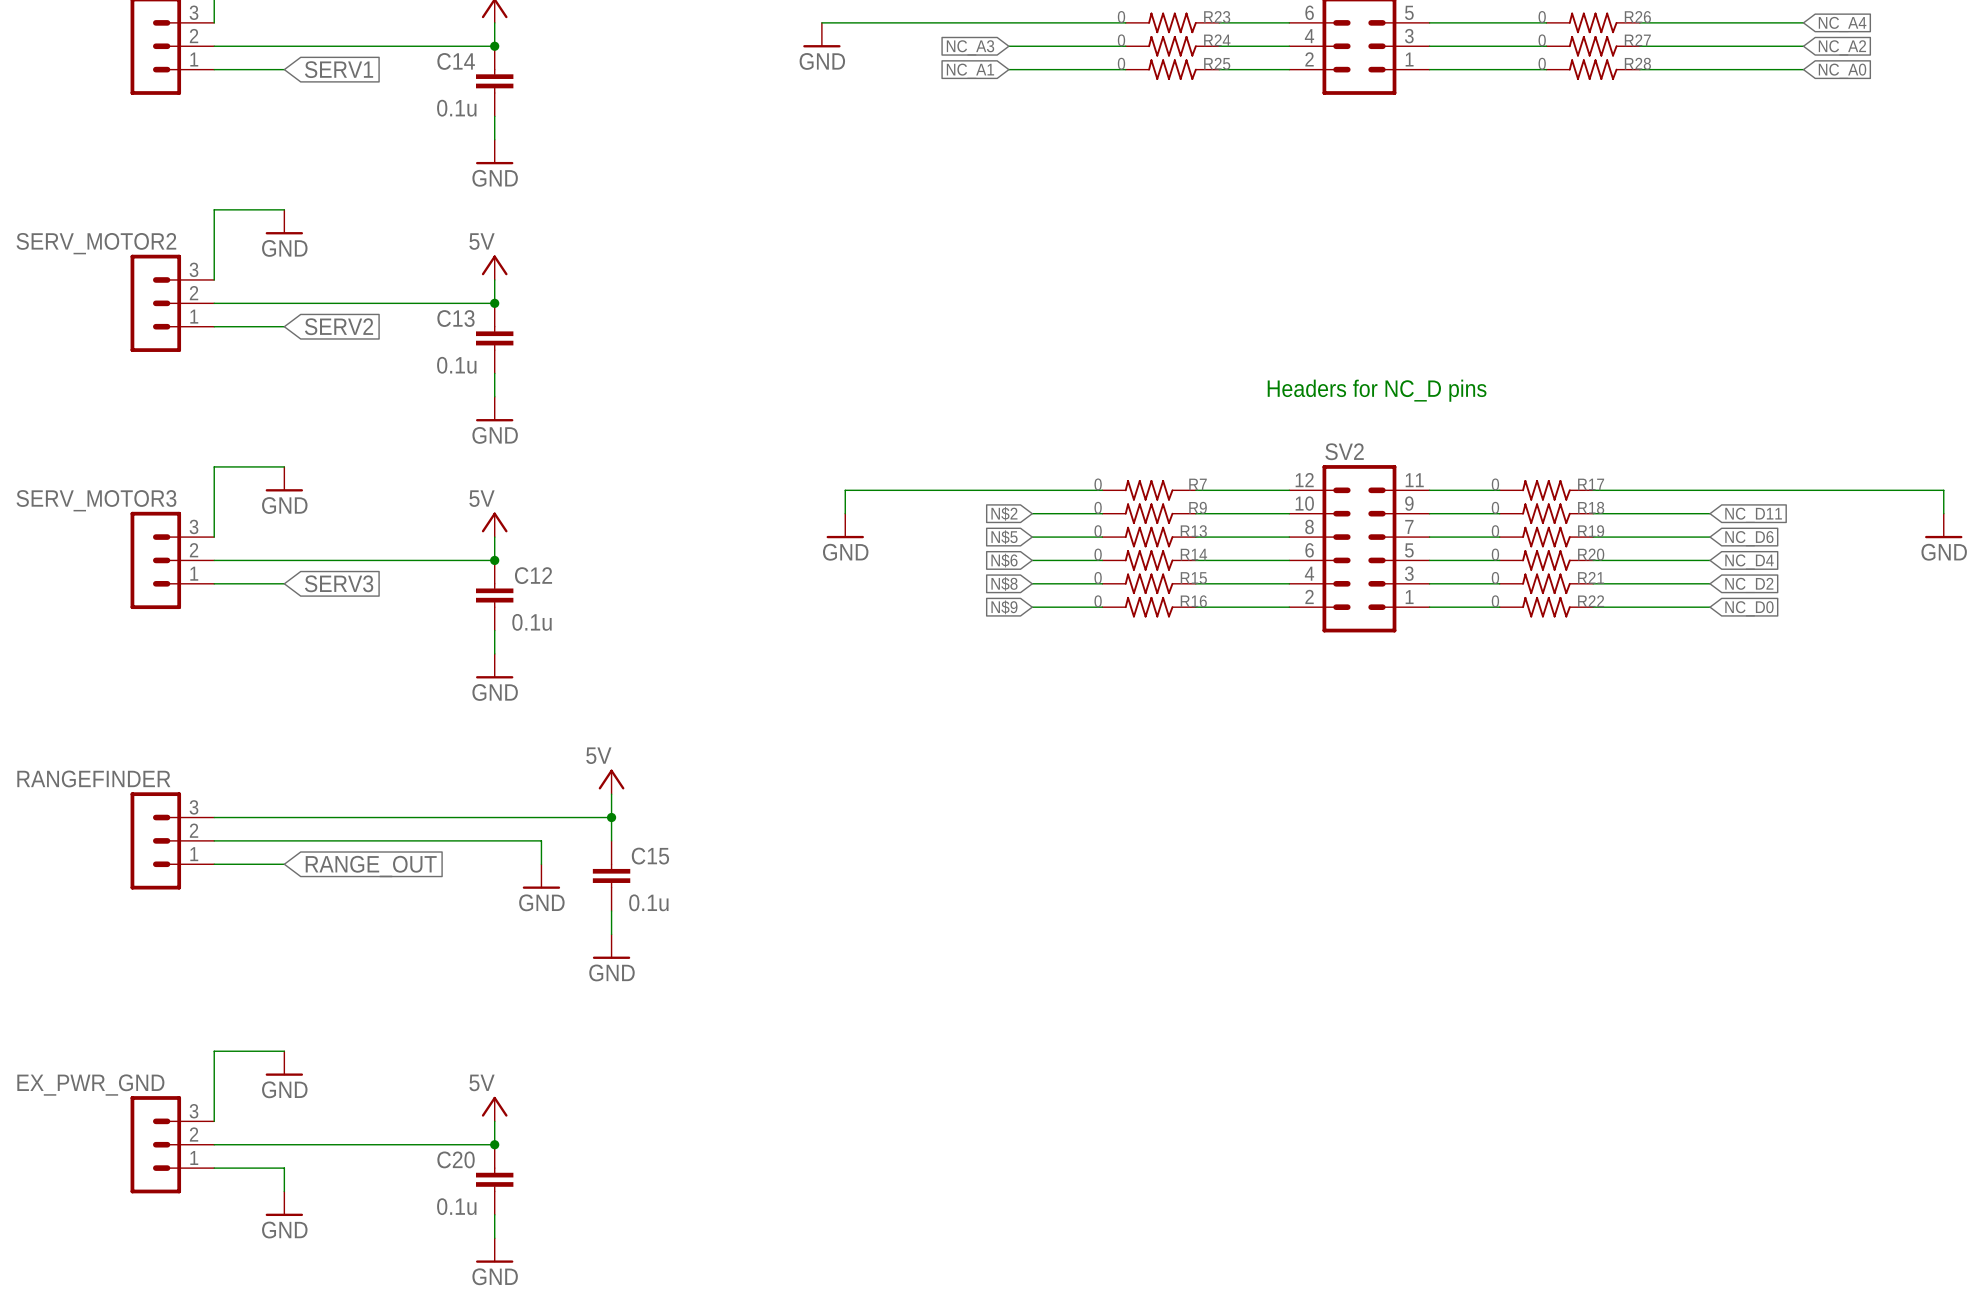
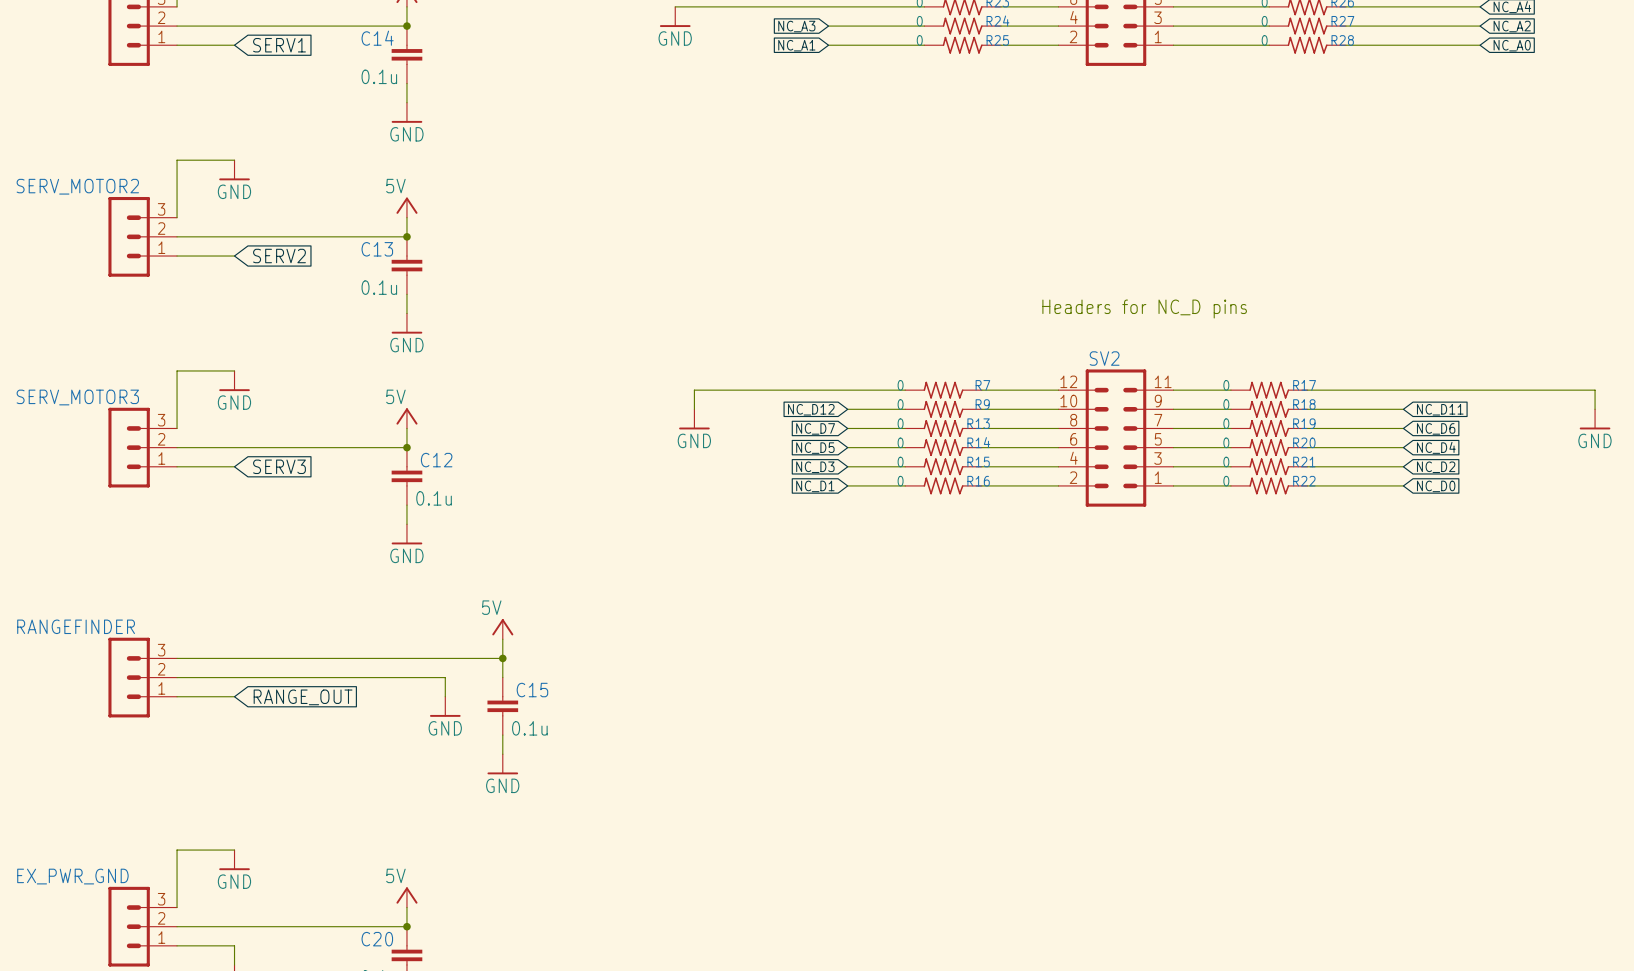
global label: N$2 (1004, 513) -> NC_D12 (811, 409)
global label: N$5 (1004, 537) -> NC_D7 (815, 428)
global label: N$6 (1004, 560) -> NC_D5 (815, 448)
global label: N$8 (1004, 583) -> NC_D3 (815, 467)
global label: N$9 (1004, 607) -> NC_D1 (815, 486)

